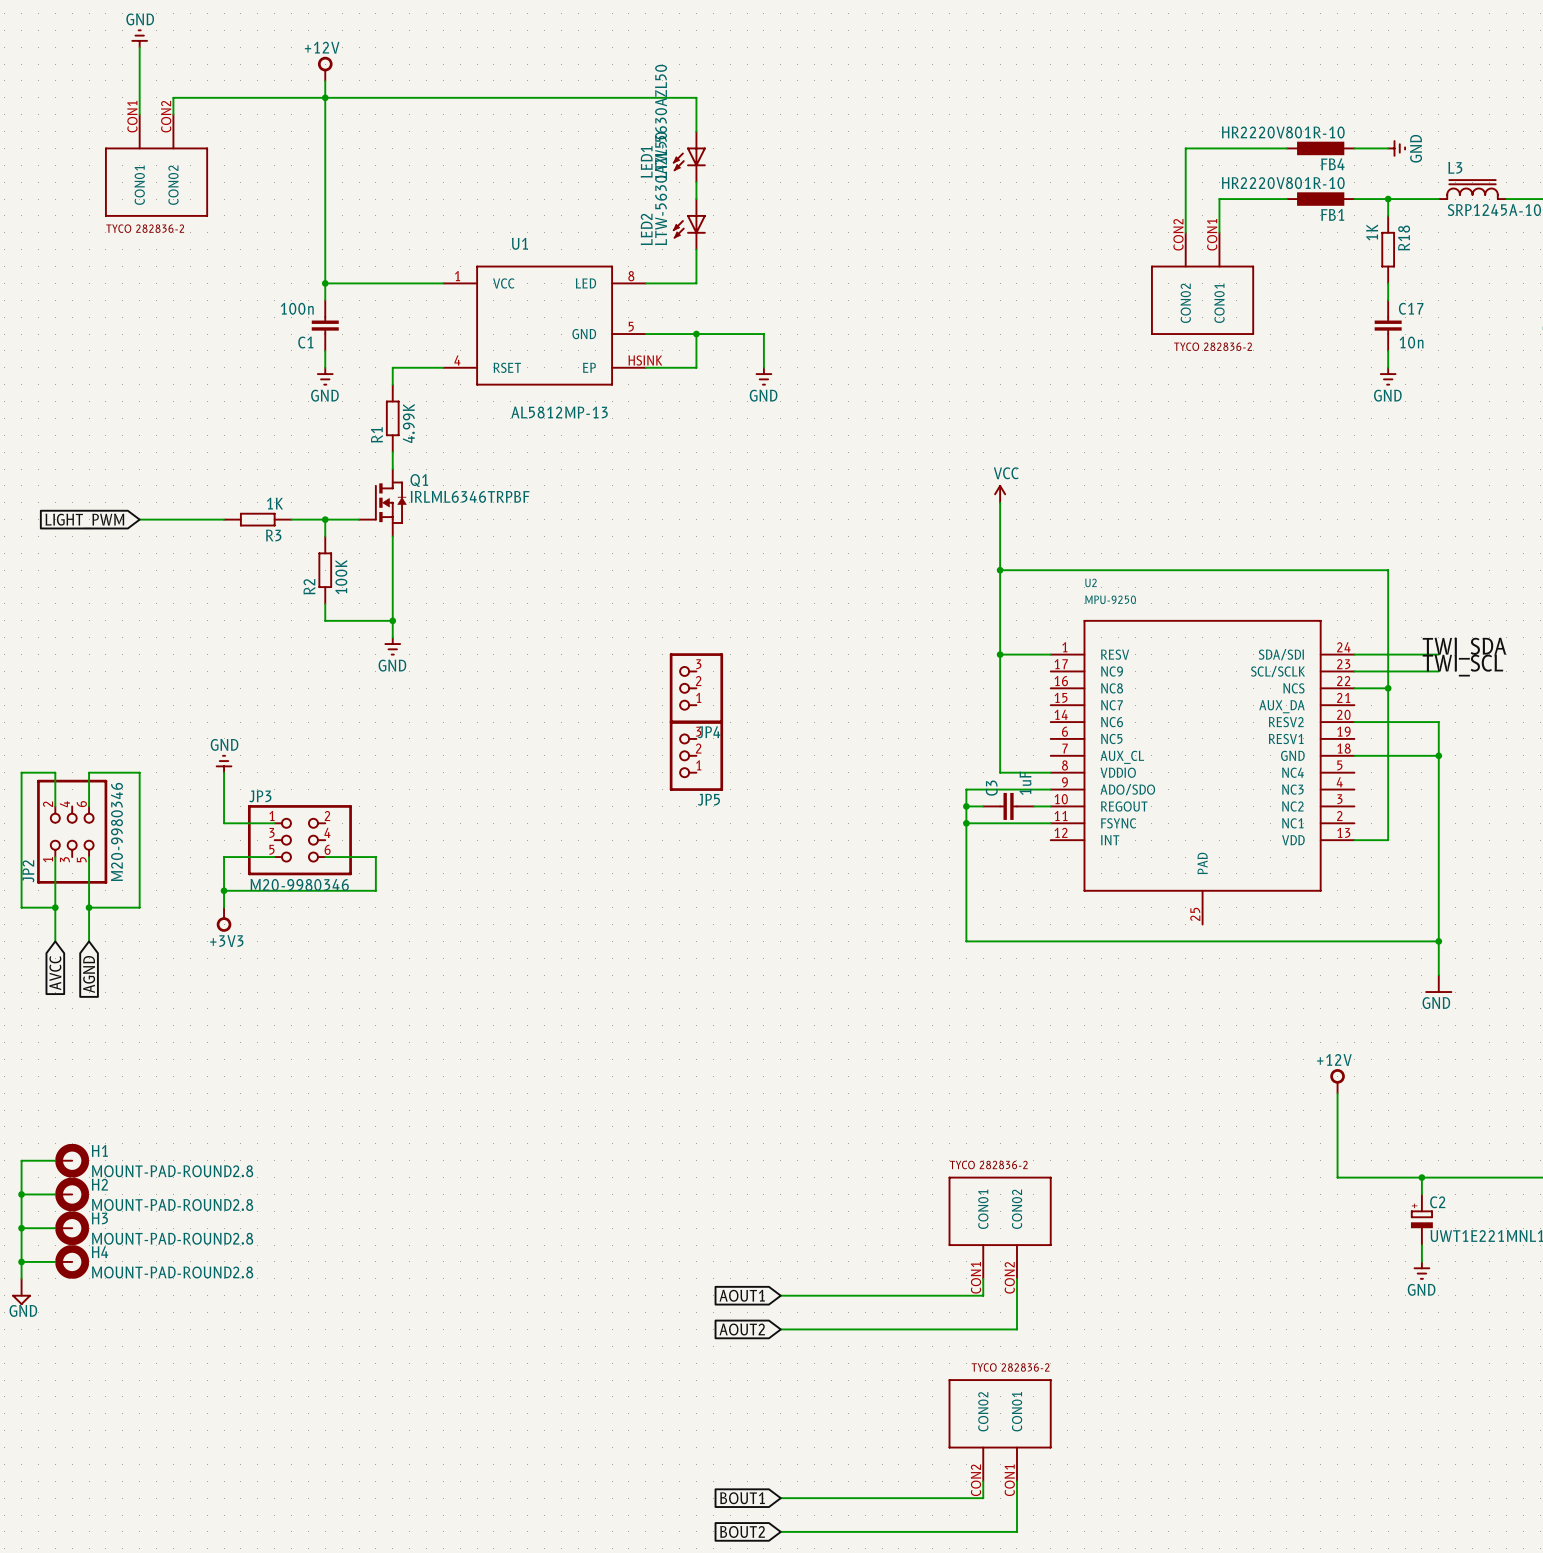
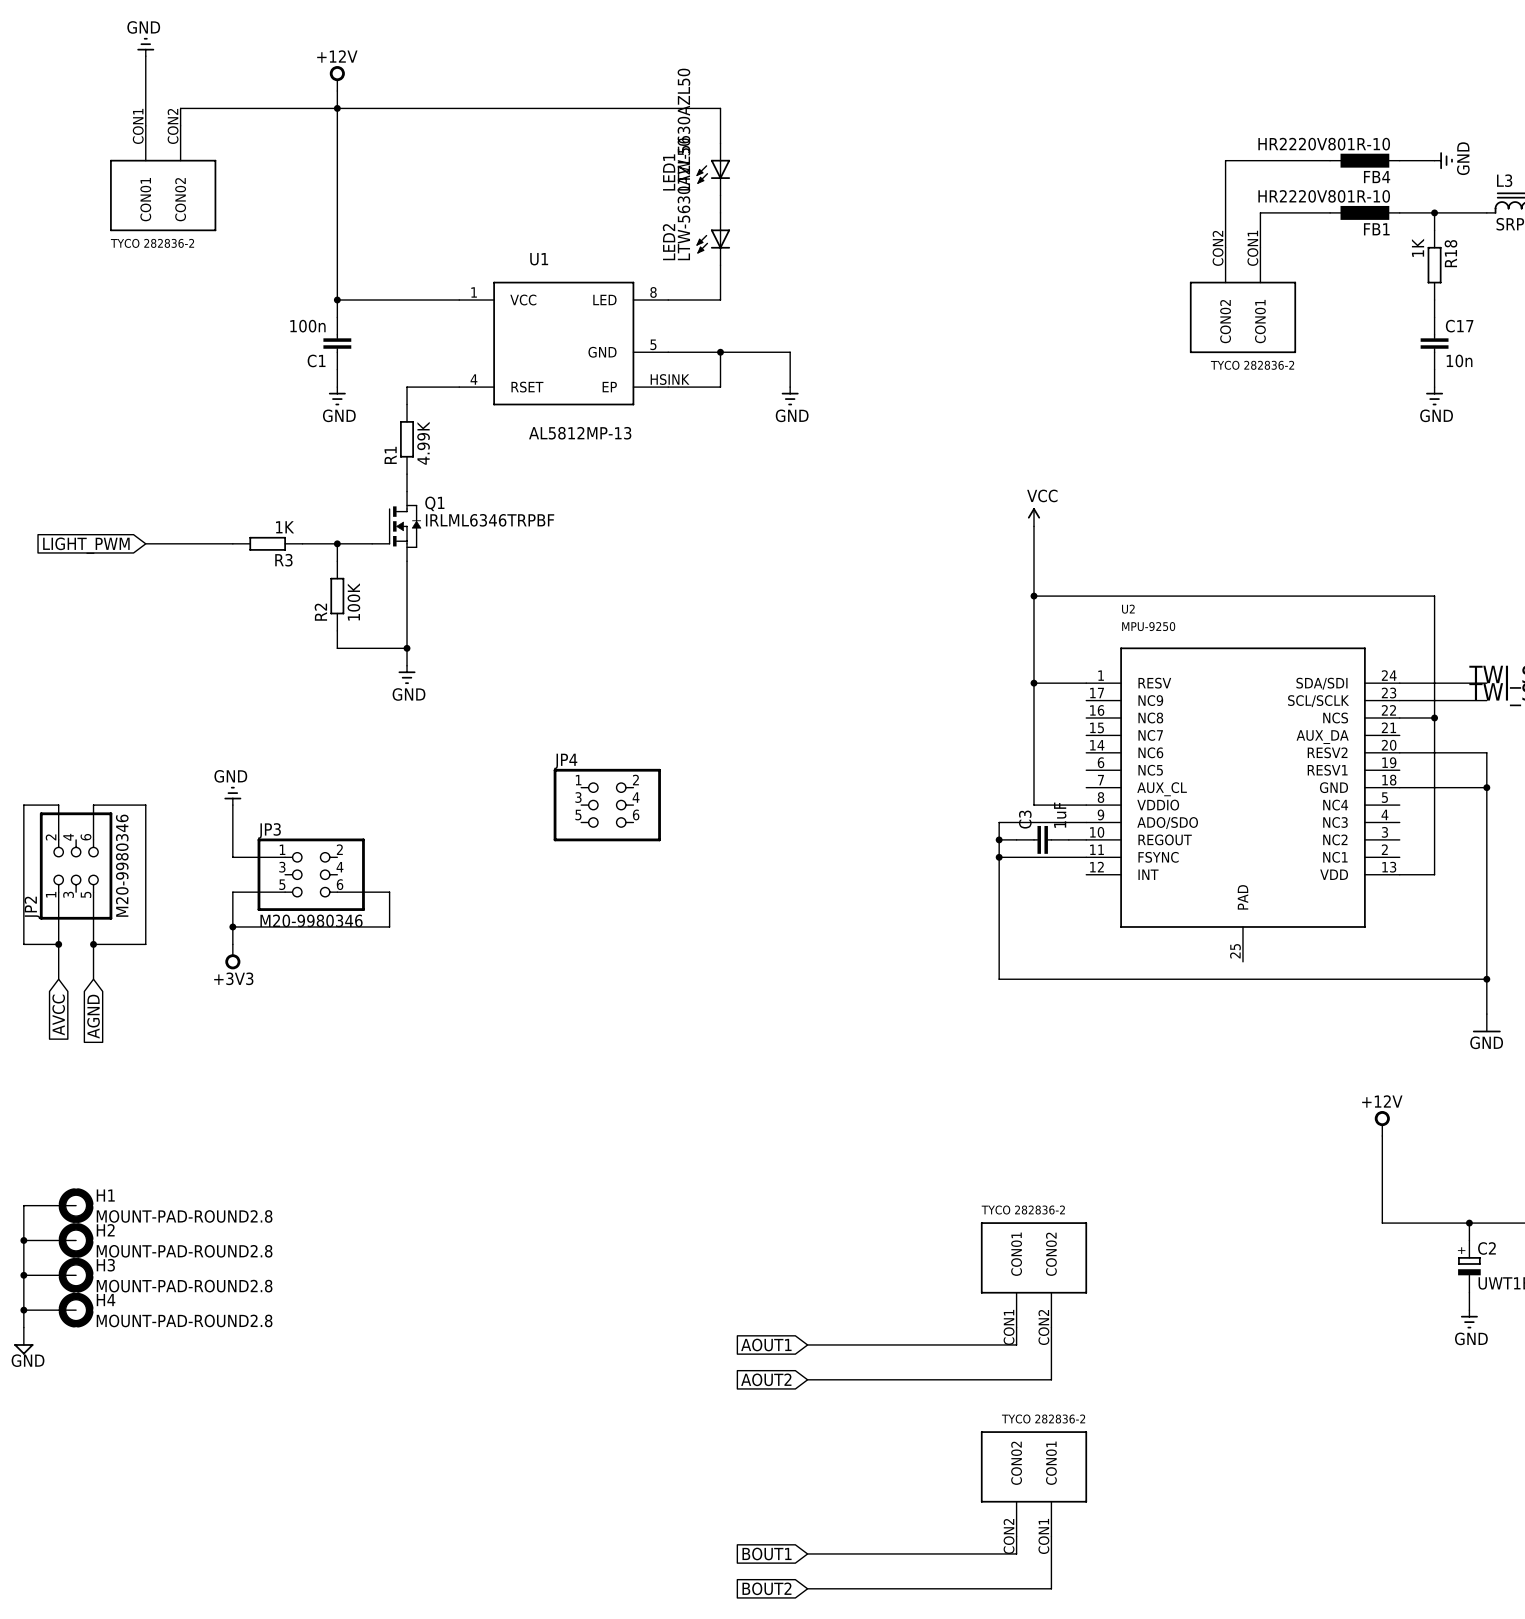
JP4 symbol: [669, 653, 724, 724] -> [553, 768, 661, 842]
JP4 name position: JP4 (709, 732) -> JP4 (565, 761)
JP5: (696, 755) -> none

